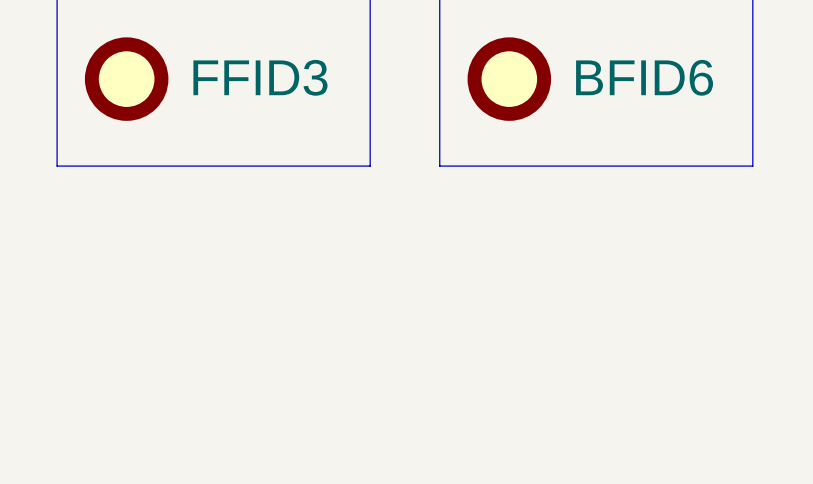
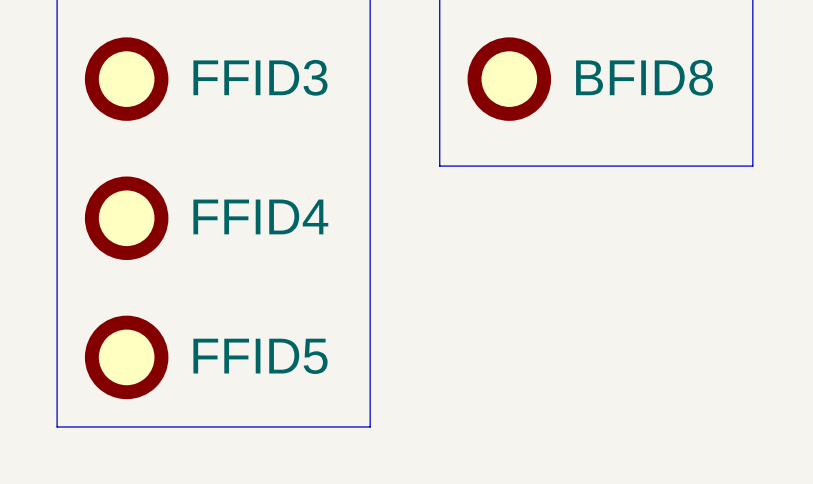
BFID6 name: BFID6 (644, 77) -> BFID8 (644, 77)
line: (57, 166) (370, 166) -> (57, 166) (57, 426) (370, 426) (370, 166)
FFID4: none -> (126, 218)
FFID5: none -> (126, 357)

